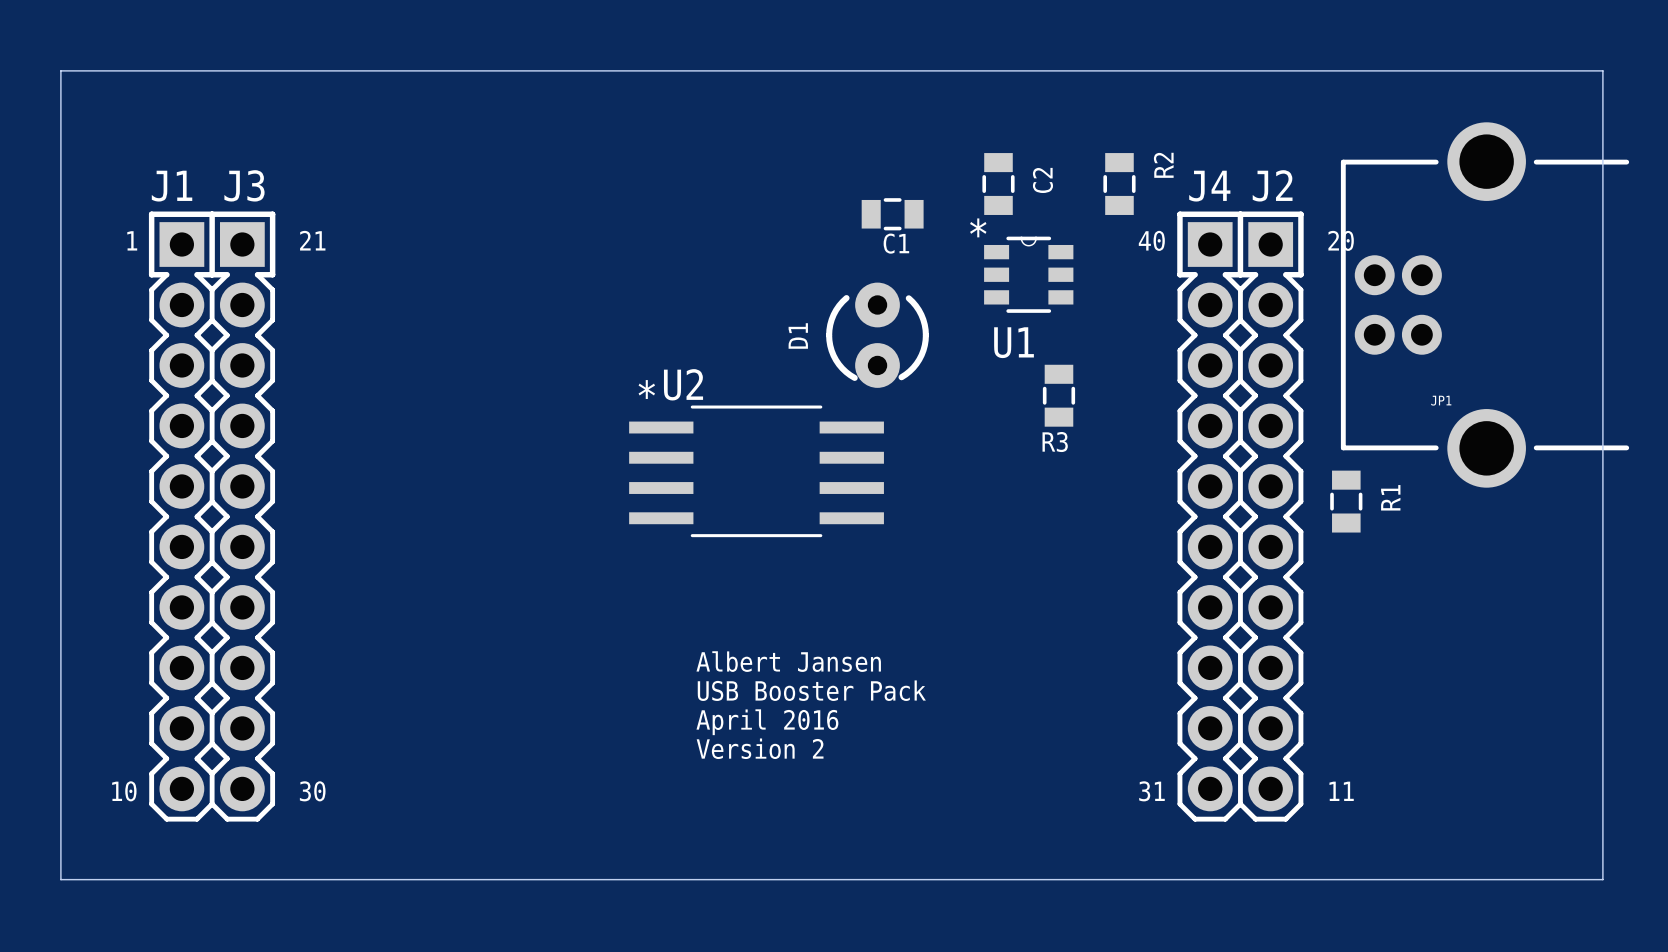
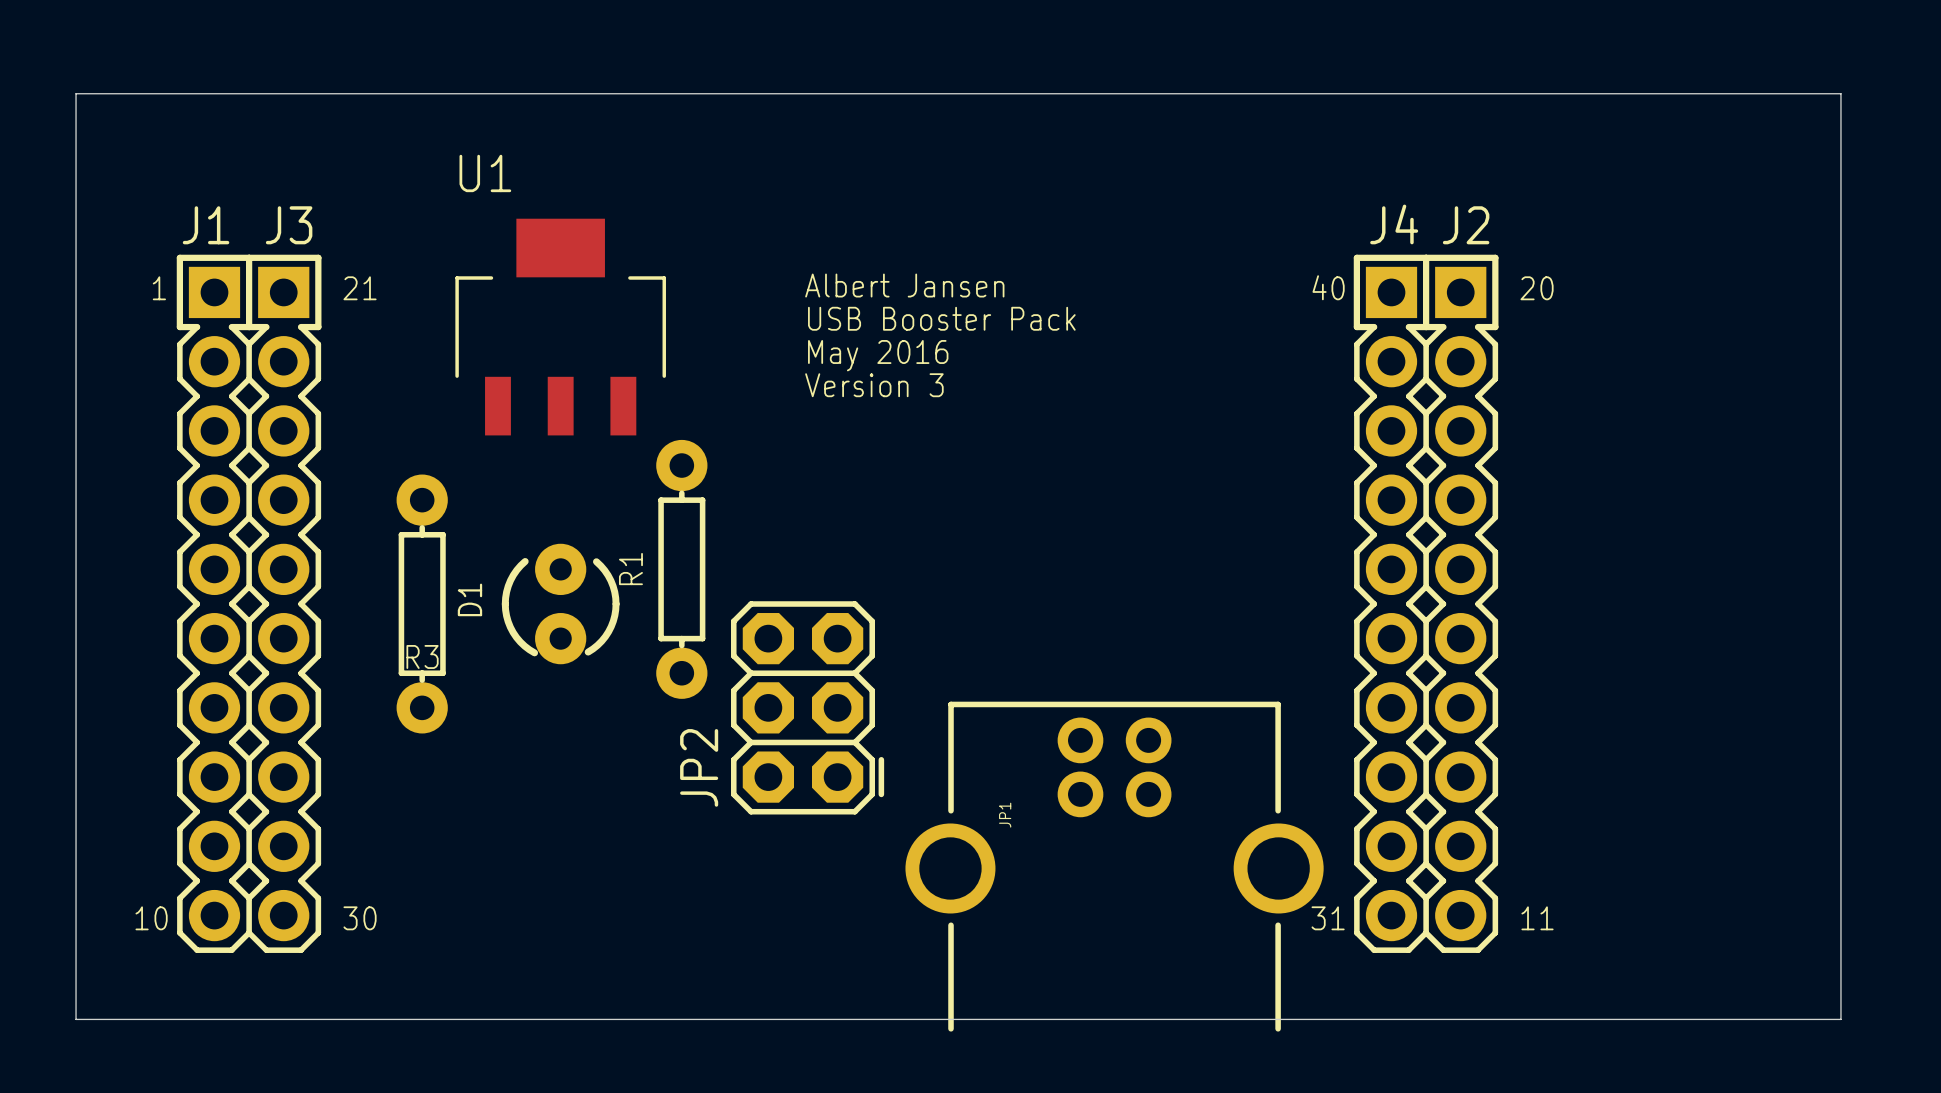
C2: (998, 184) -> none
R2: (1119, 184) -> none
C1: (892, 214) -> none
U1 footprint: [984, 236, 1074, 313] -> [455, 218, 666, 436]
text: none -> May 2016 (878, 355)
JP1 rotation: 0° (1485, 304) -> 90° clockwise (1114, 866)
JP1 position: (1485, 304) -> (1114, 866)
text: none -> Version 3 (874, 385)
D1 position: (877, 335) -> (560, 604)
U1 name position: U1 (1014, 342) -> U1 (485, 173)
R3 footprint: [1042, 364, 1076, 427] -> [396, 474, 448, 734]
R1 footprint: [1330, 470, 1363, 533] -> [656, 439, 708, 699]
U2: (756, 471) -> none
R1 name position: R1 (1390, 497) -> R1 (630, 569)
JP2: none -> (807, 707)
text position: Albert Jansen (788, 661) -> Albert Jansen (904, 285)
text position: USB Booster Pack (811, 690) -> USB Booster Pack (941, 318)
text: April 2016 (767, 722) -> none
text: Version 2 (760, 748) -> none

